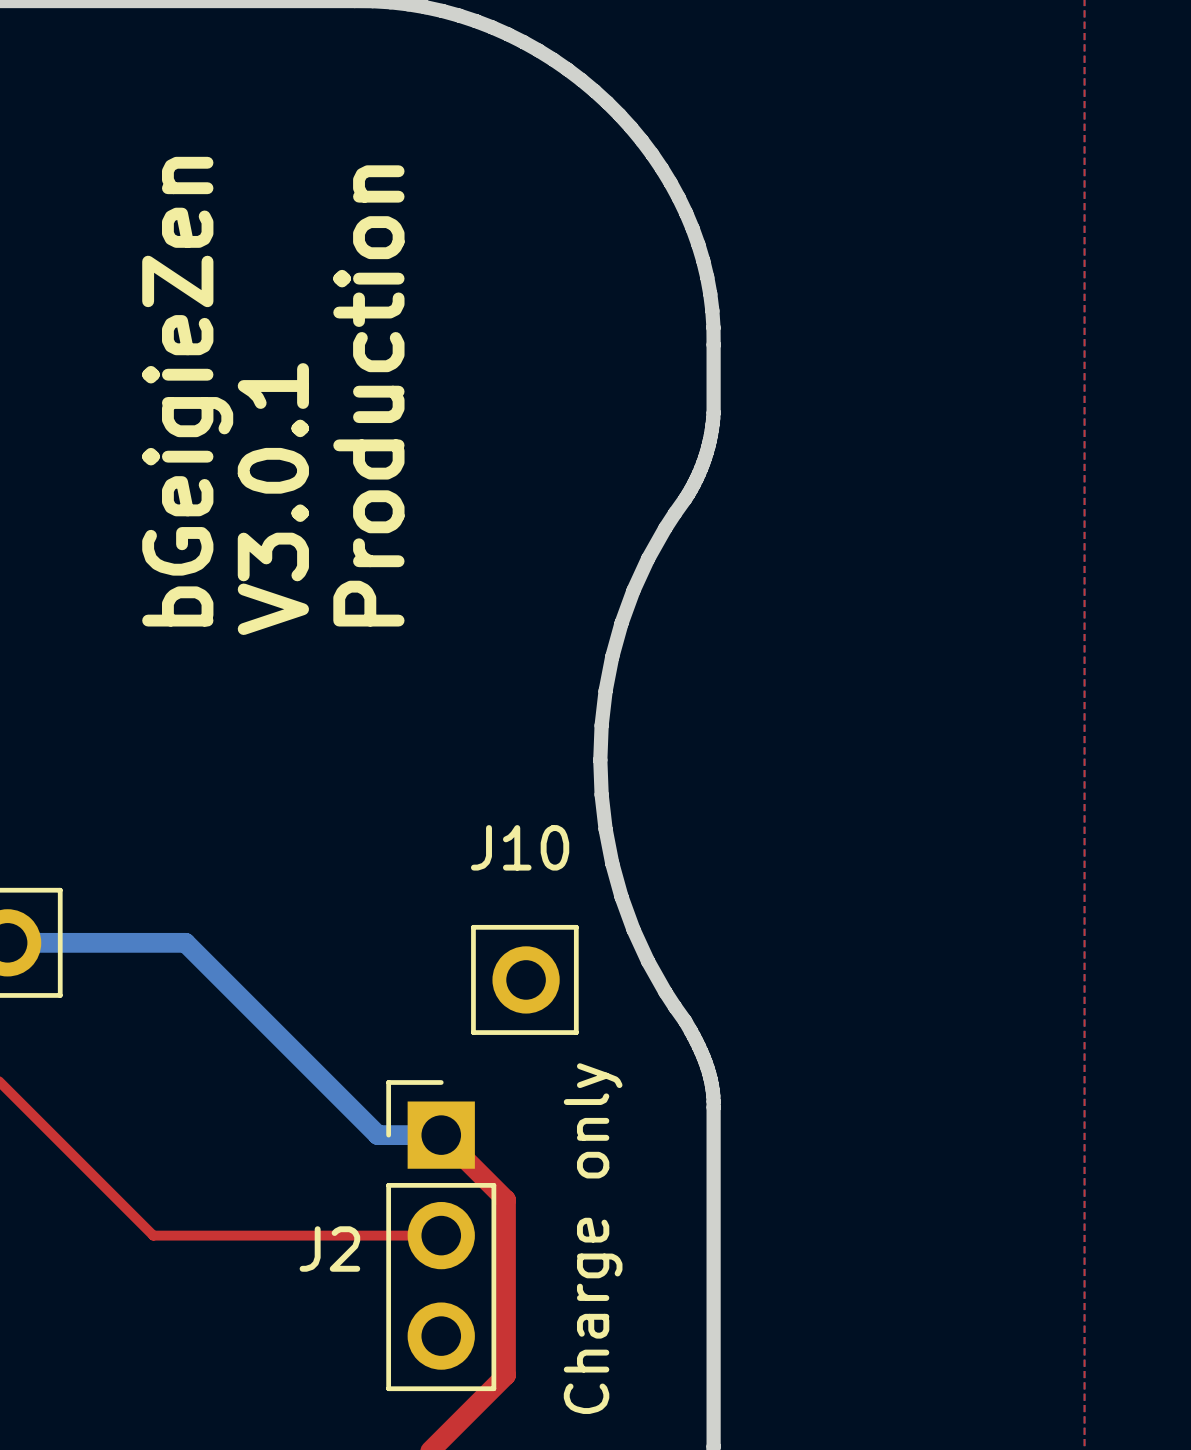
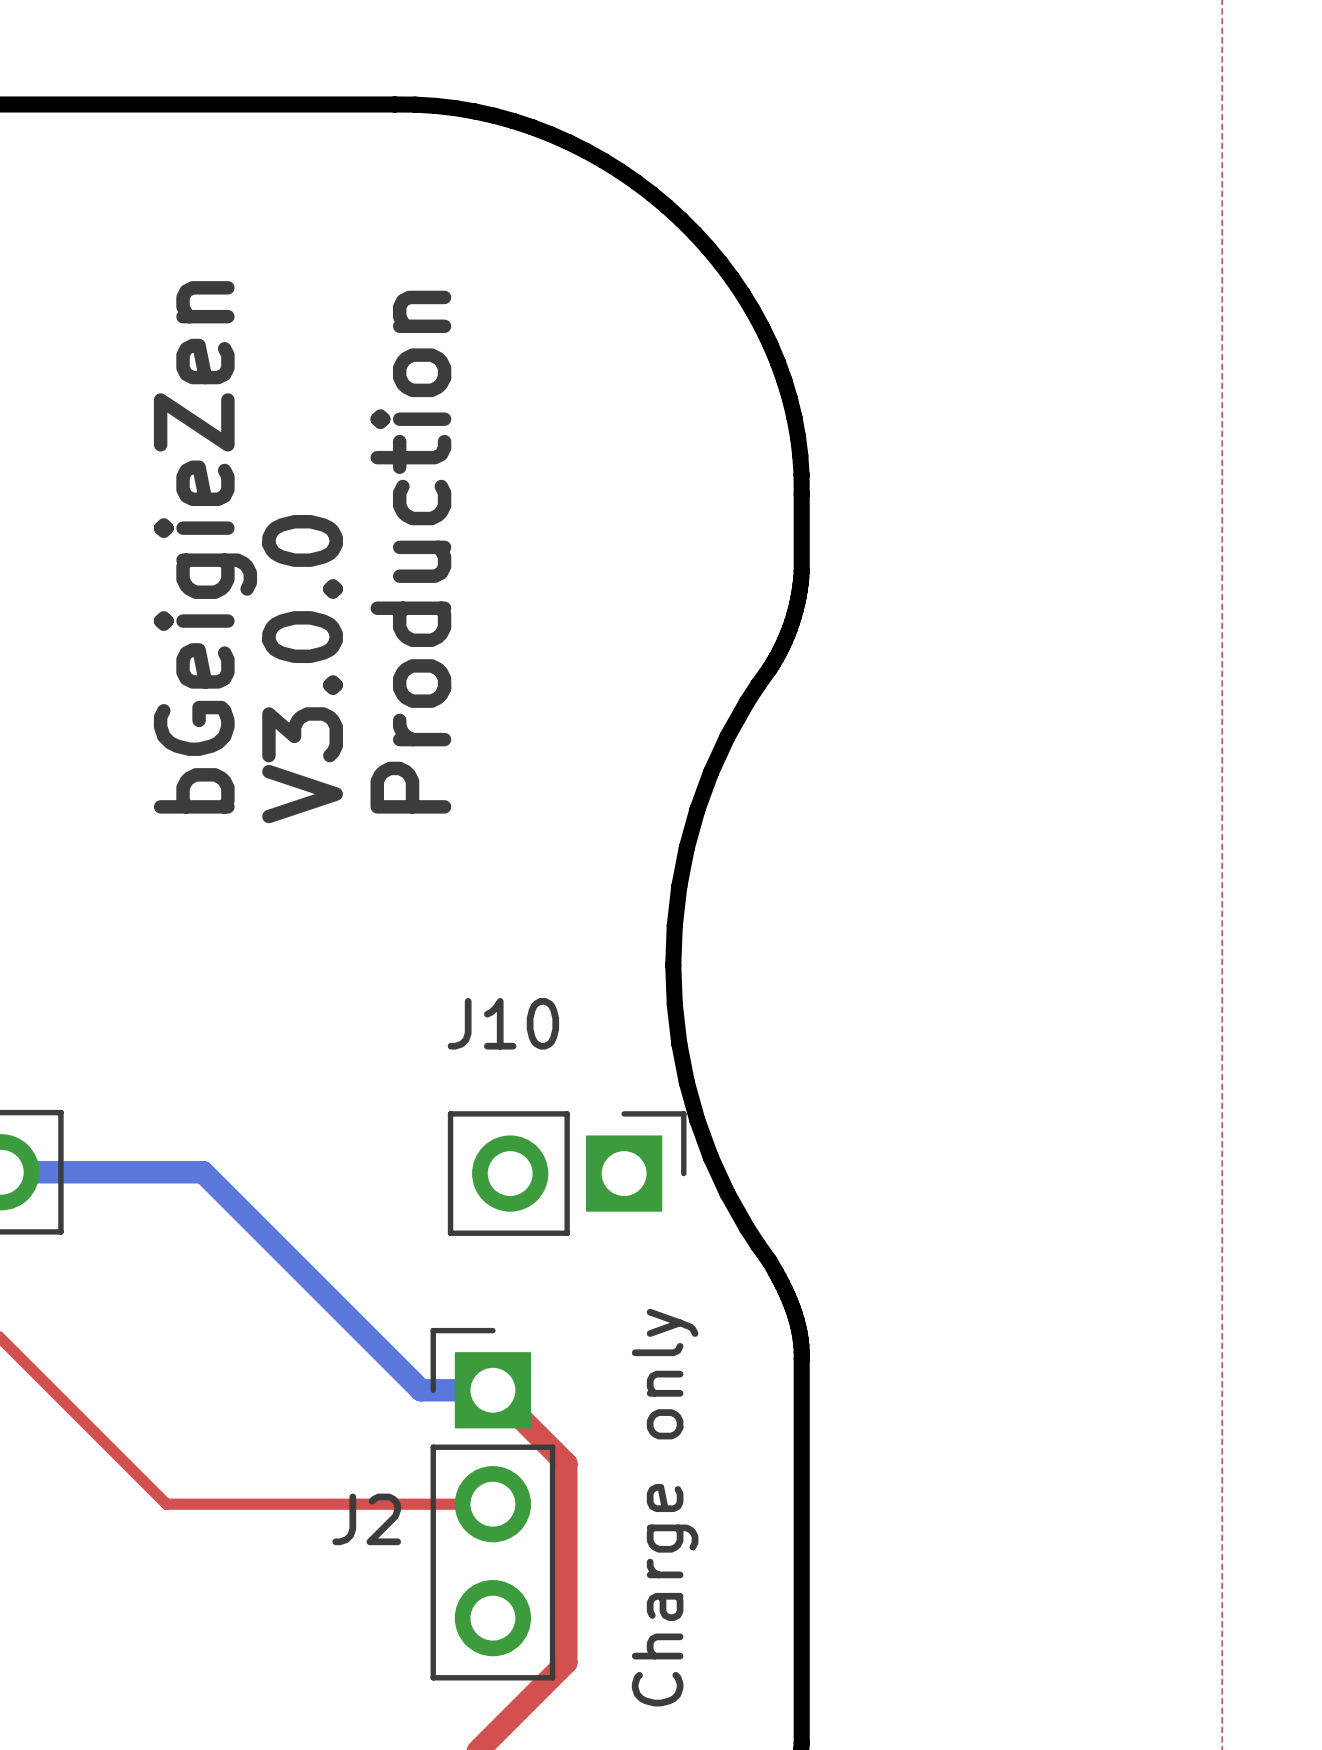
text: V3.0.1 (273, 499) -> V3.0.0 (302, 669)
J10 footprint: [471, 924, 579, 1035] -> [447, 1111, 687, 1236]

